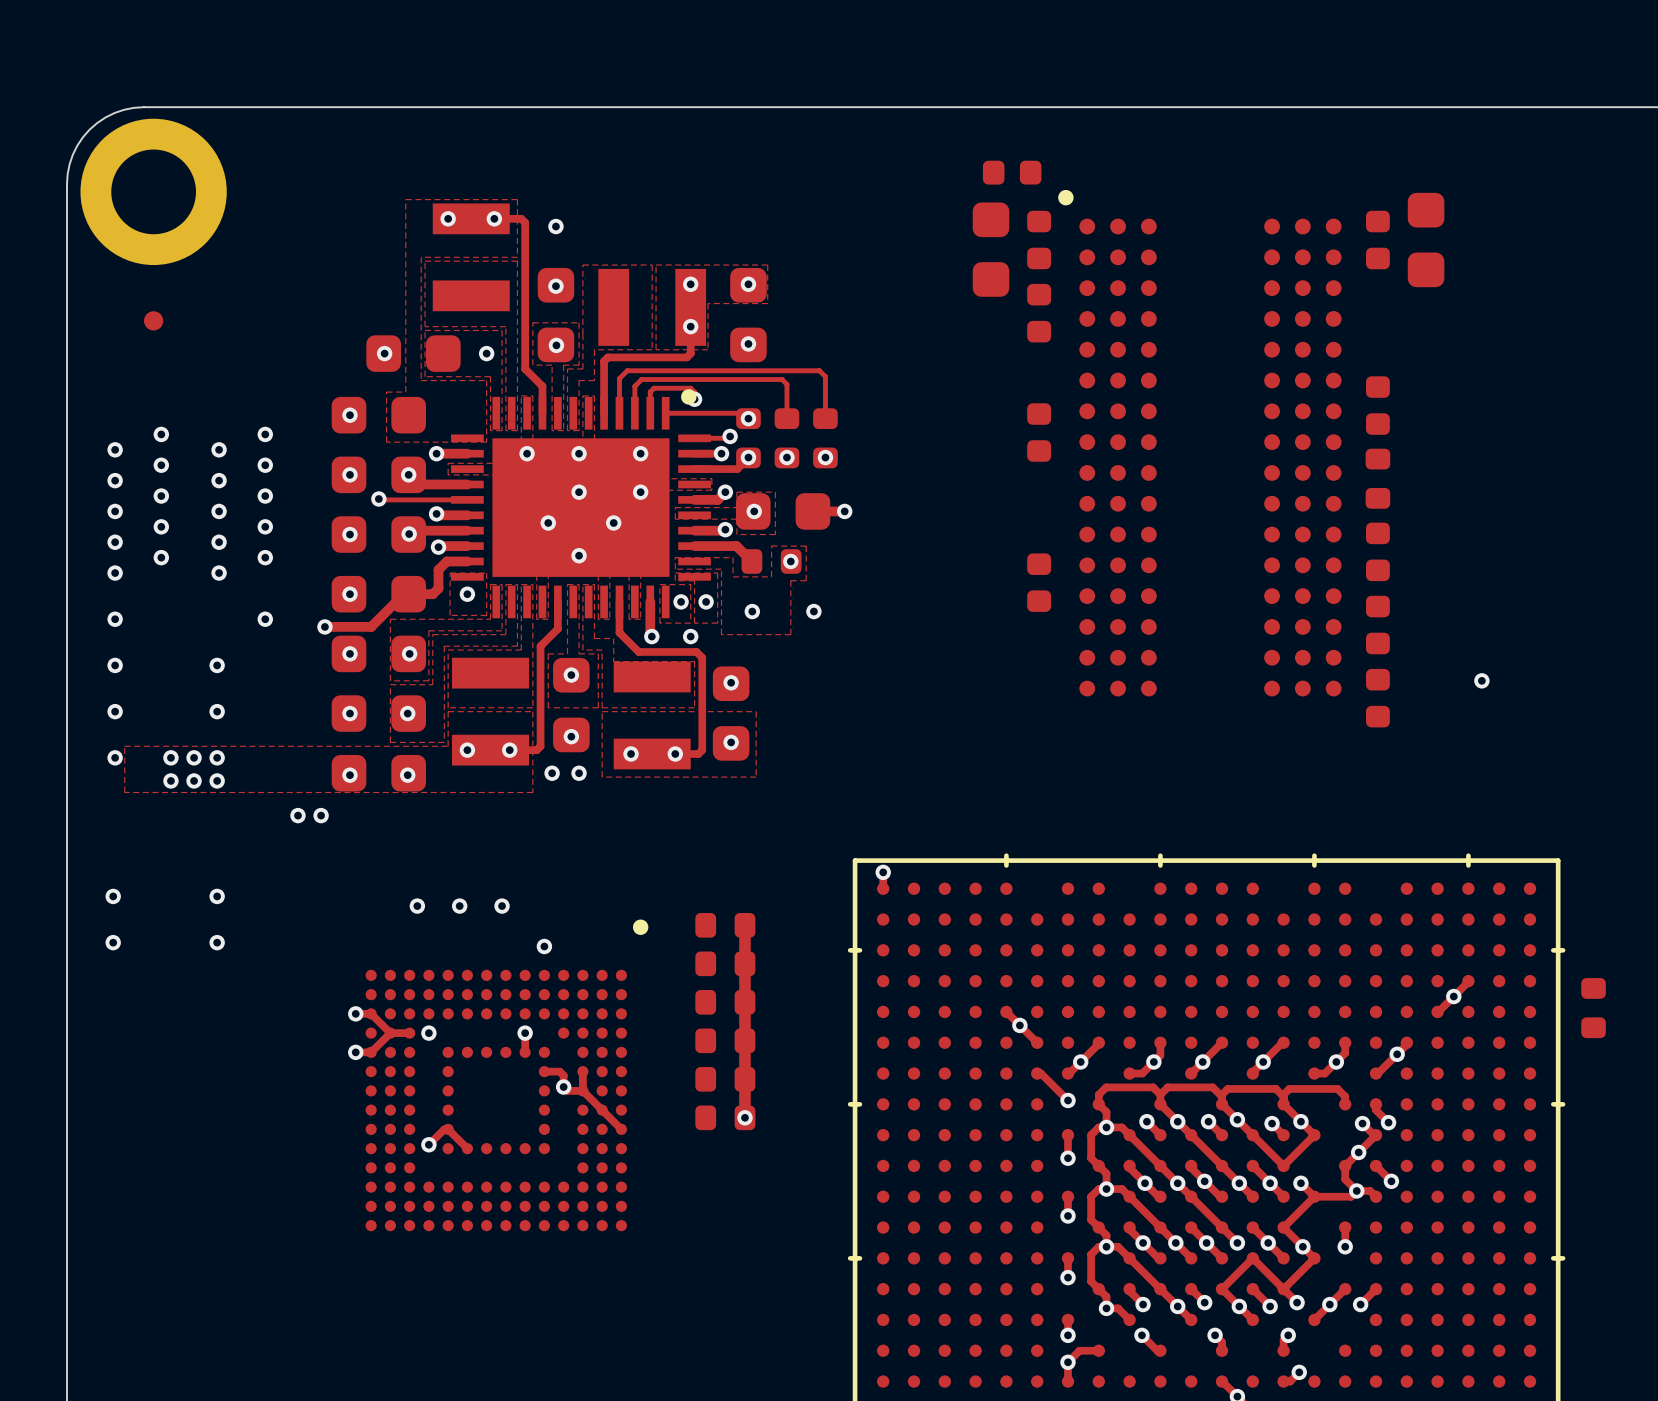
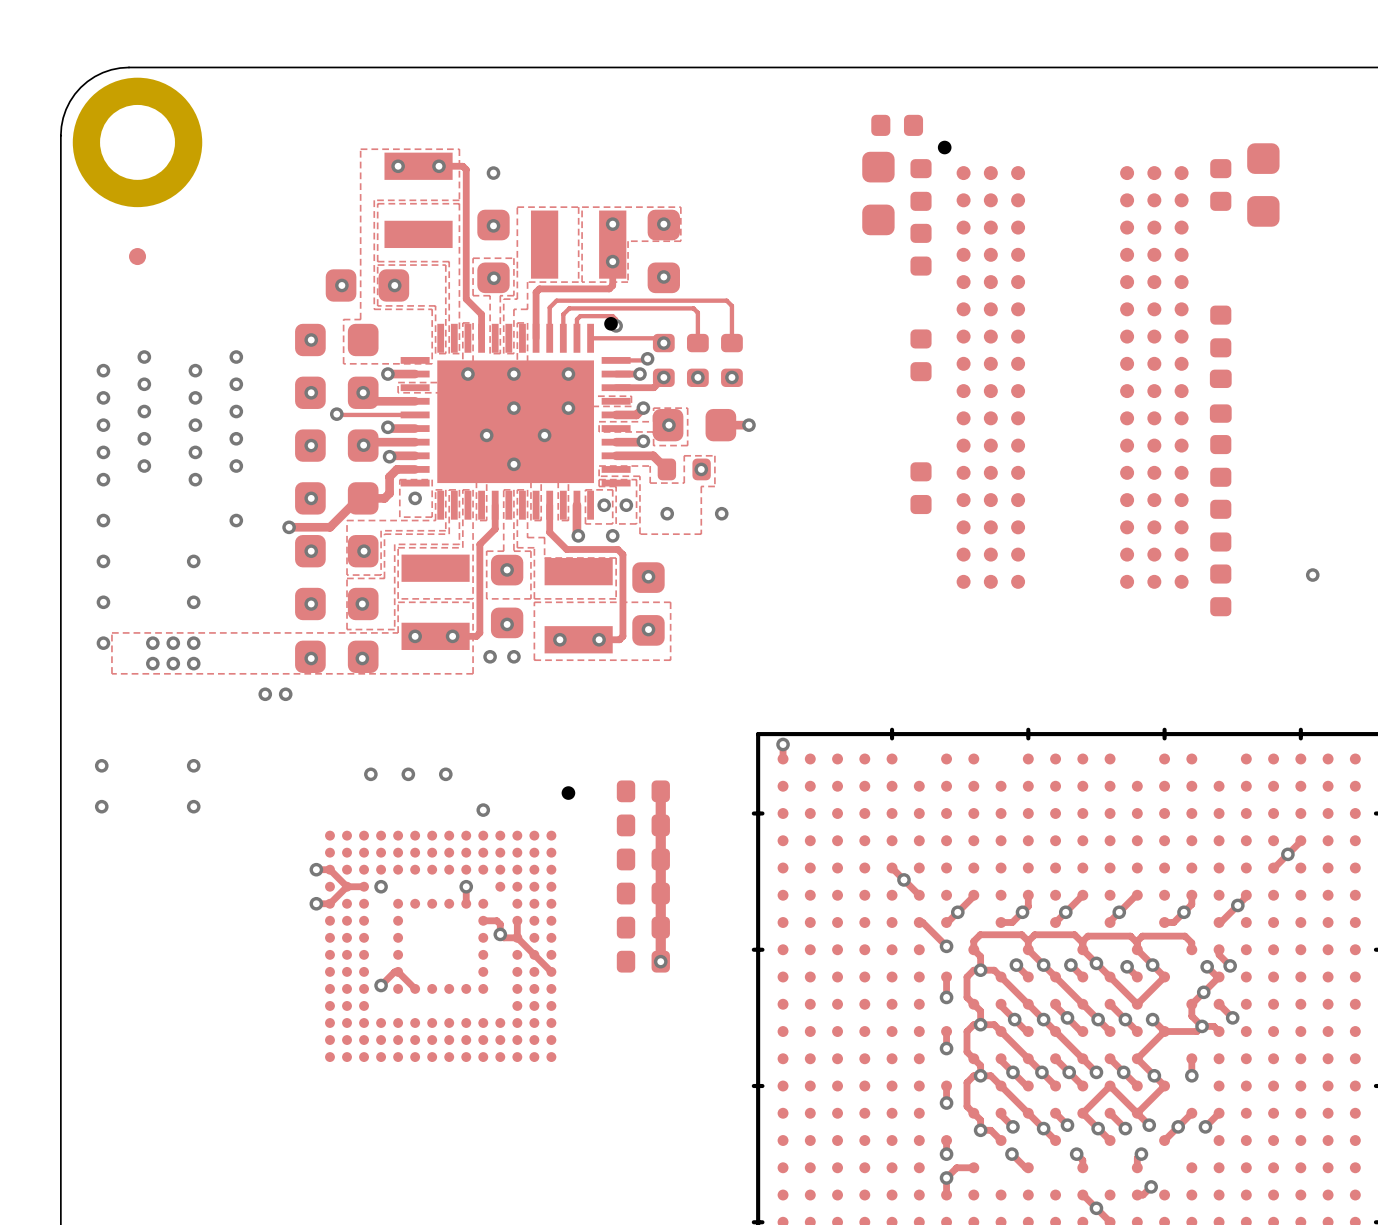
via position: (486, 353) -> (394, 285)

